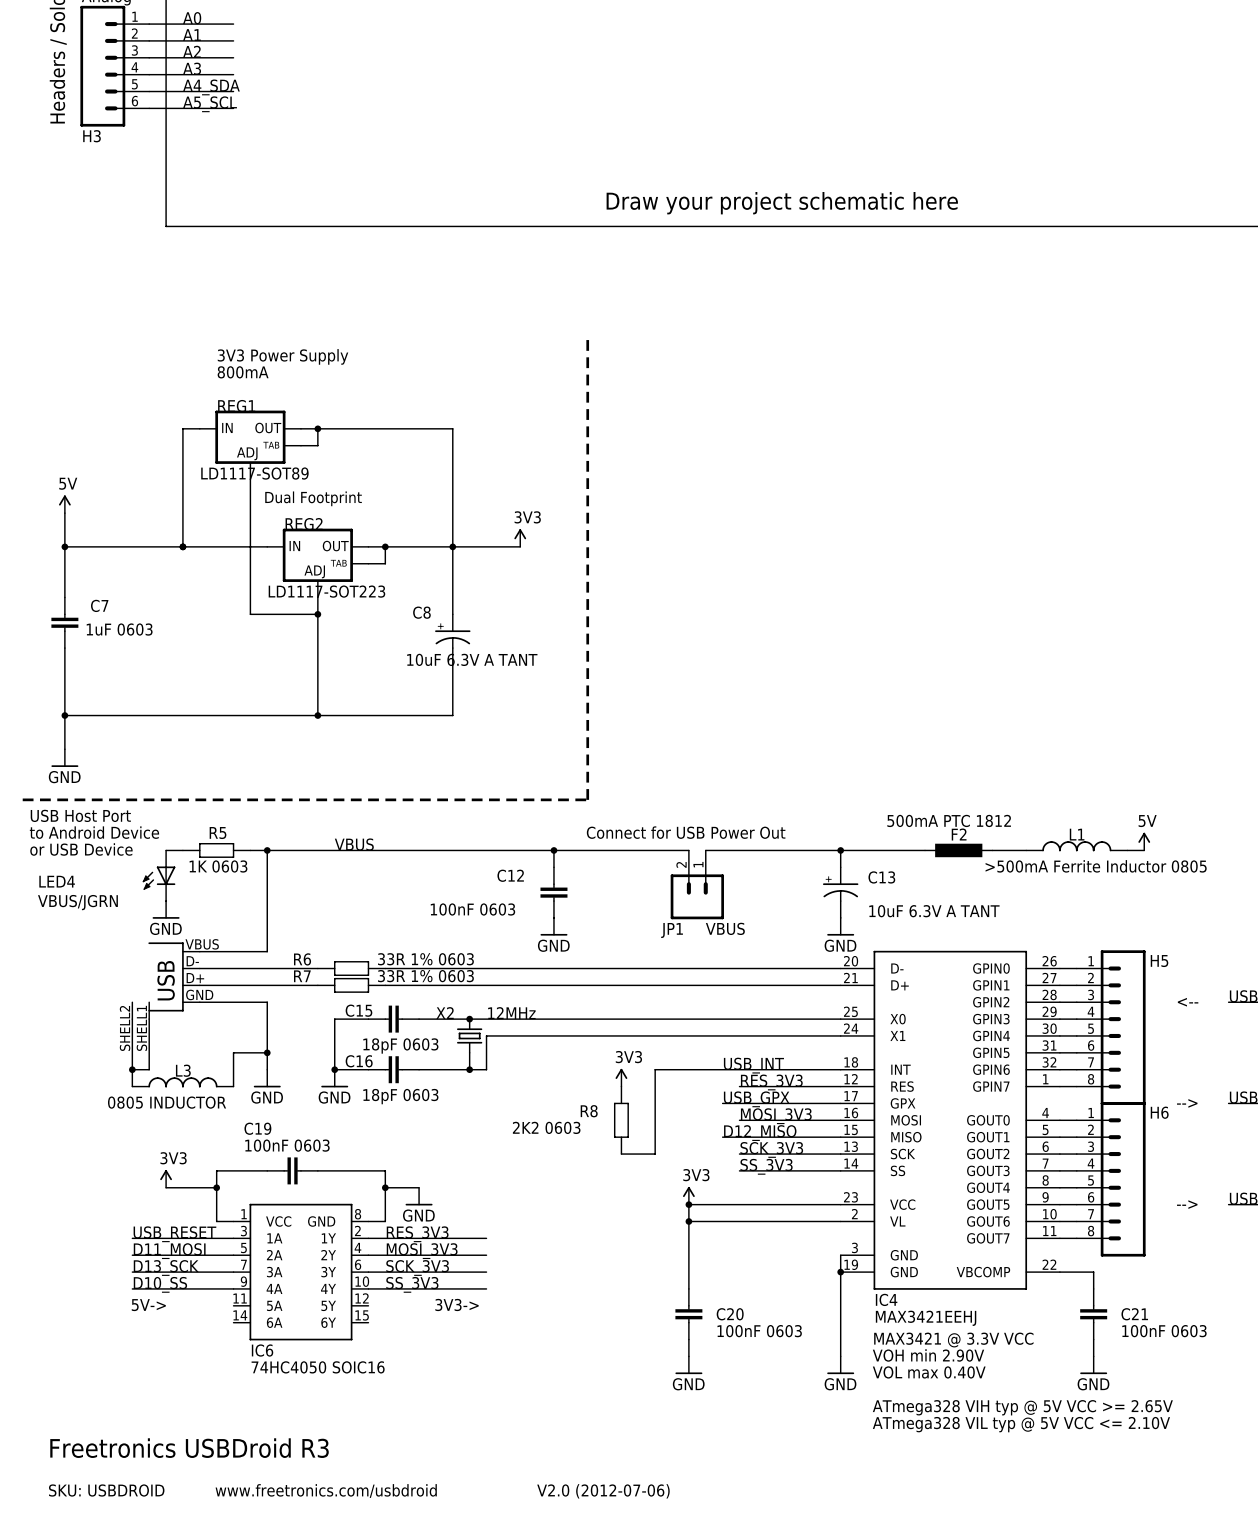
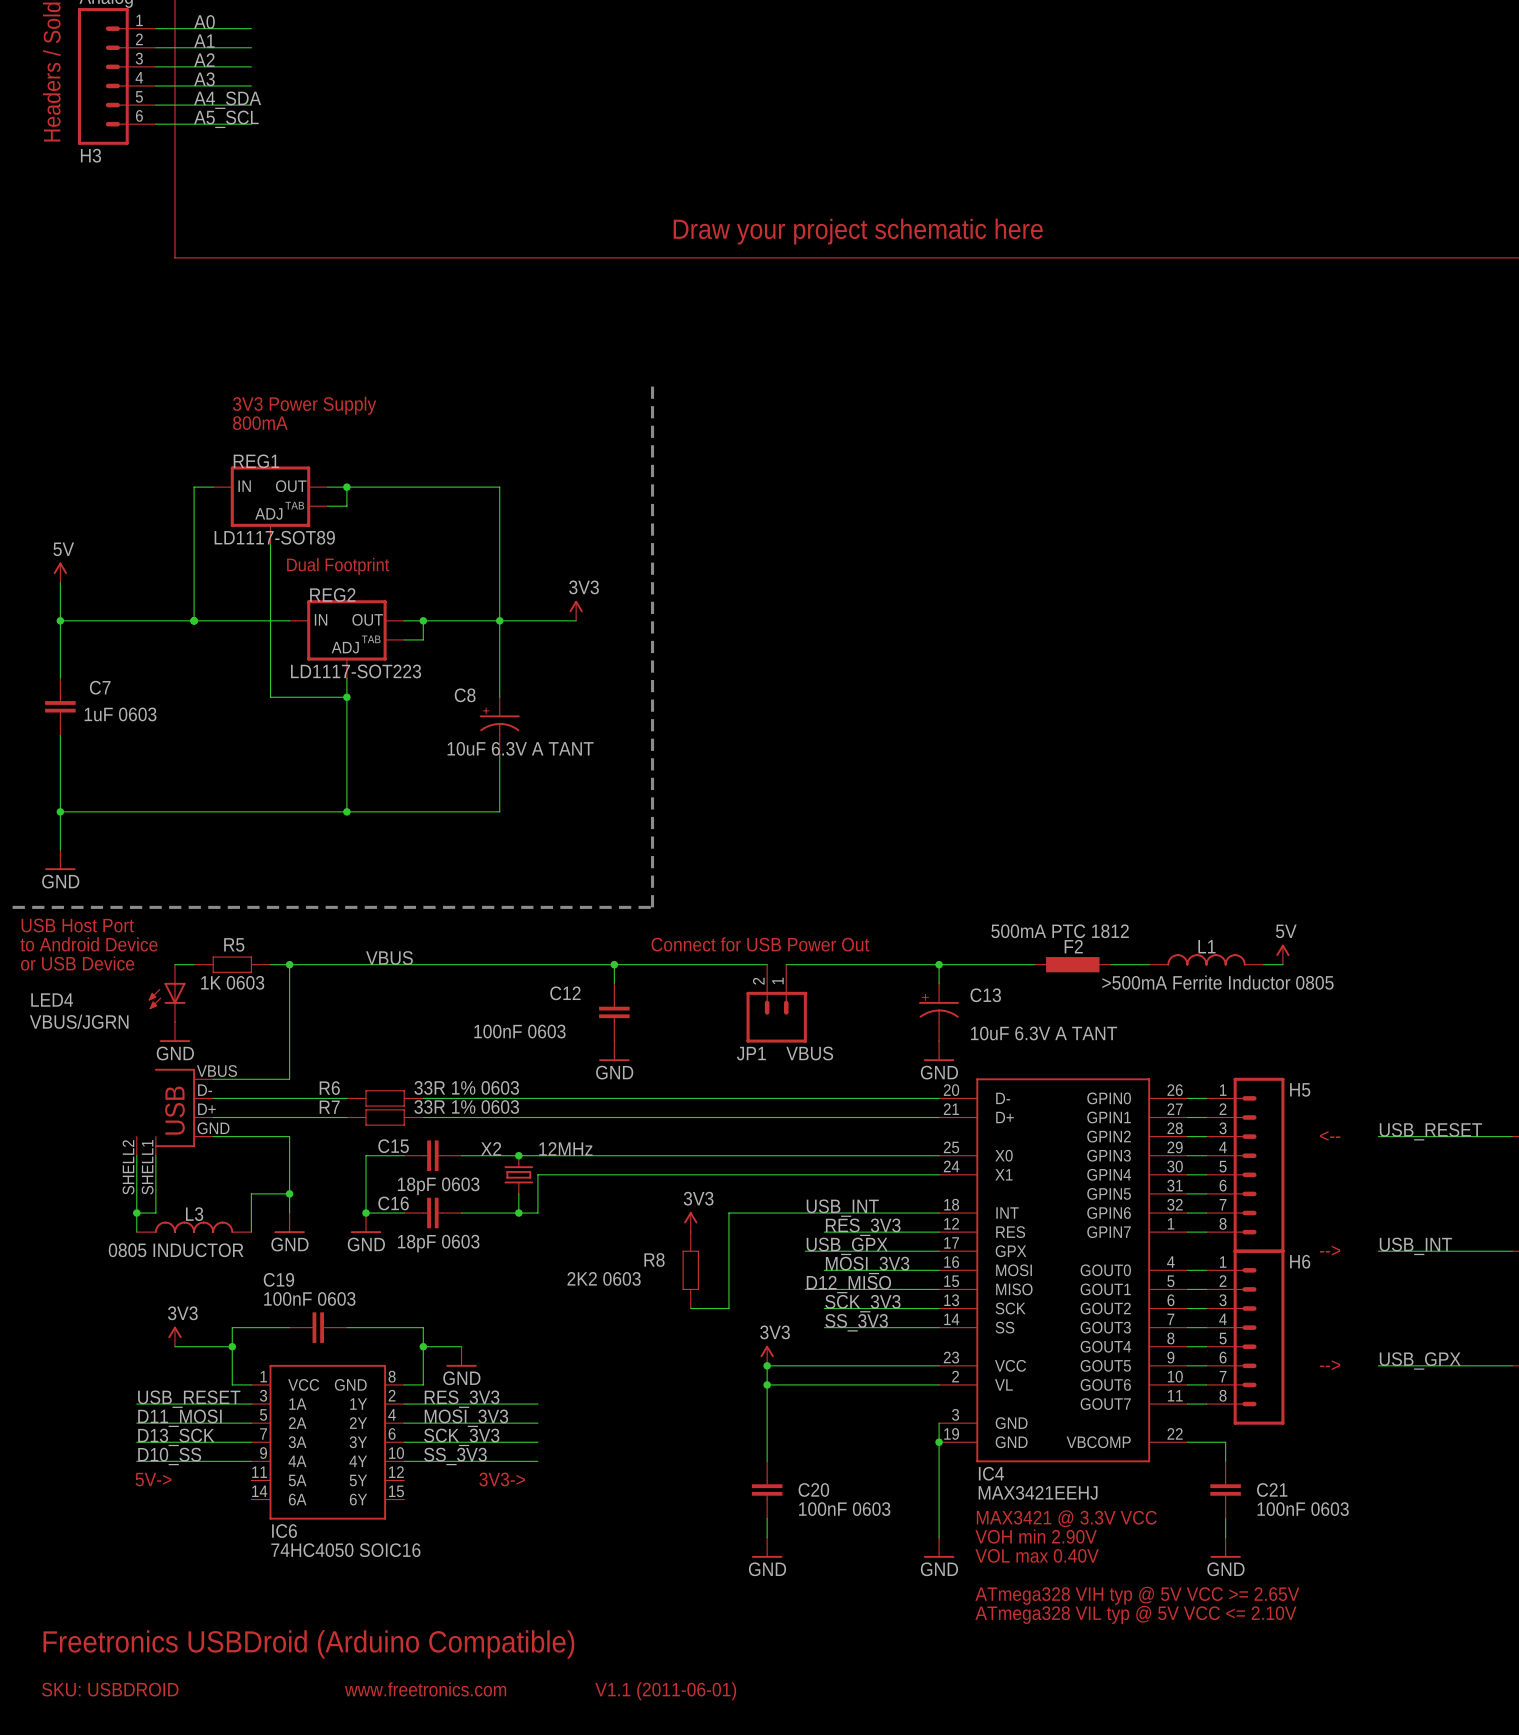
text: Freetronics USBDroid R3 (189, 1448) -> Freetronics USBDroid (Arduino Compatible) (308, 1644)
text: www.freetronics.com/usbdroid (326, 1491) -> www.freetronics.com (425, 1689)
text: V2.0 (2012-07-06) (603, 1491) -> V1.1 (2011-06-01) (665, 1691)

